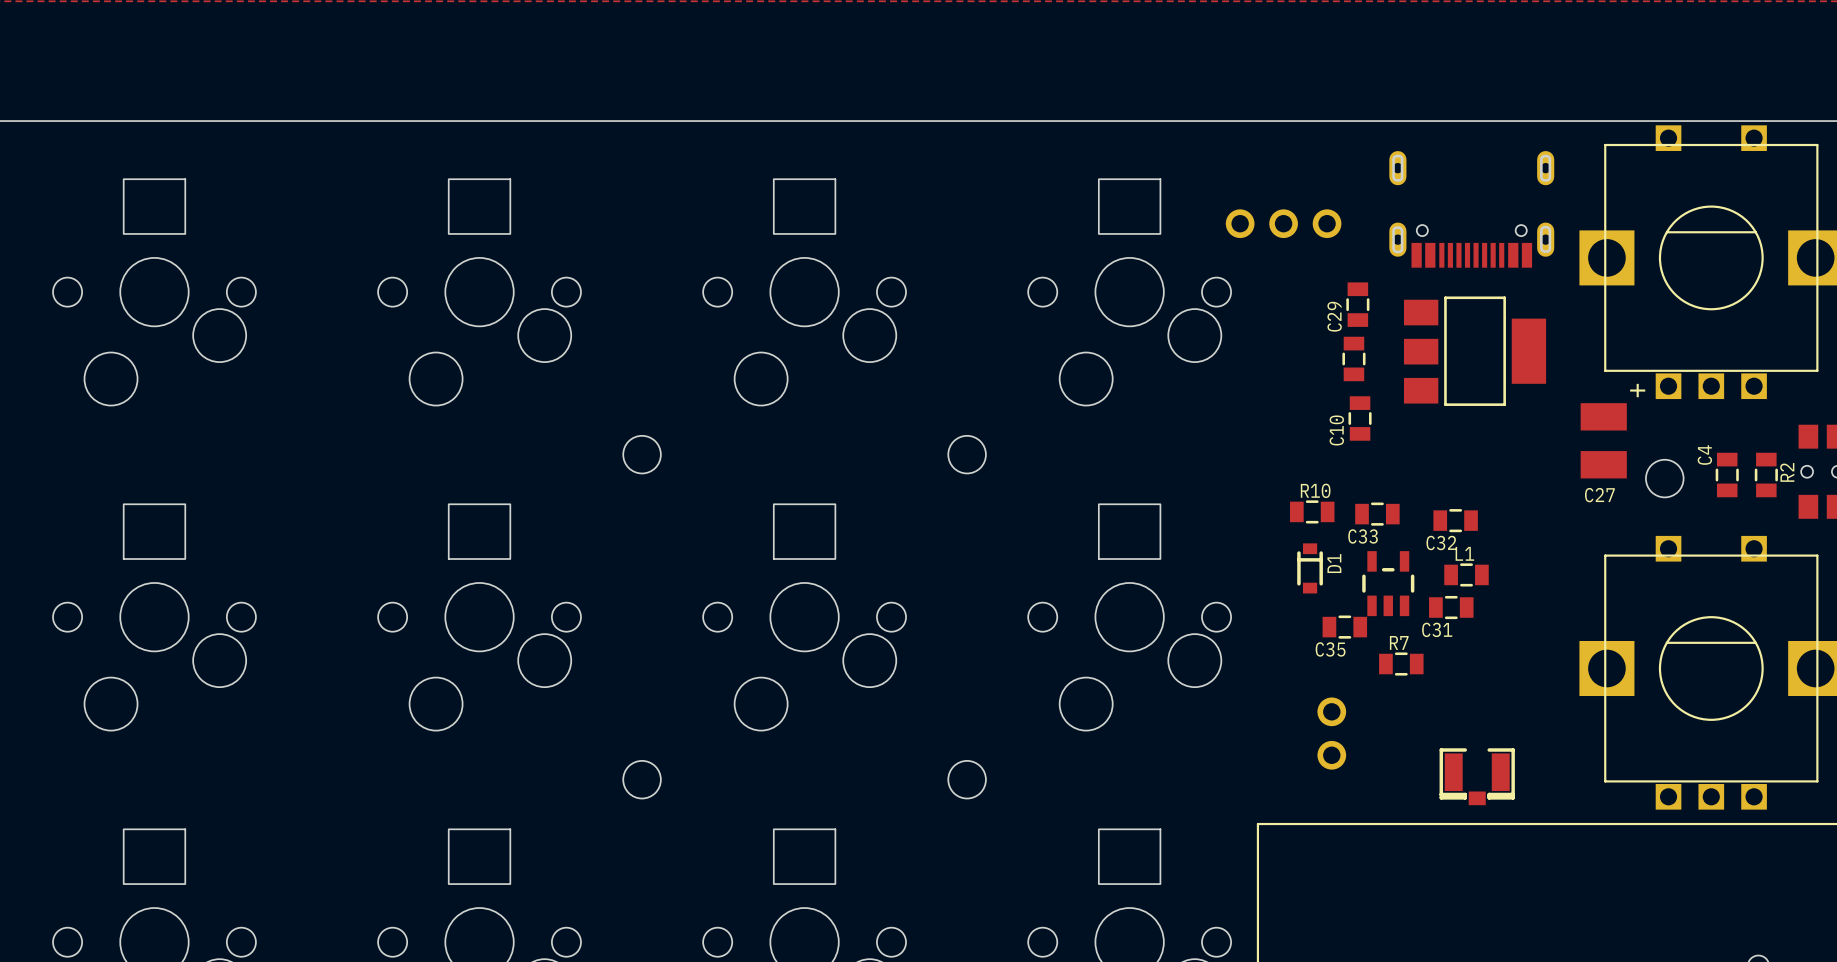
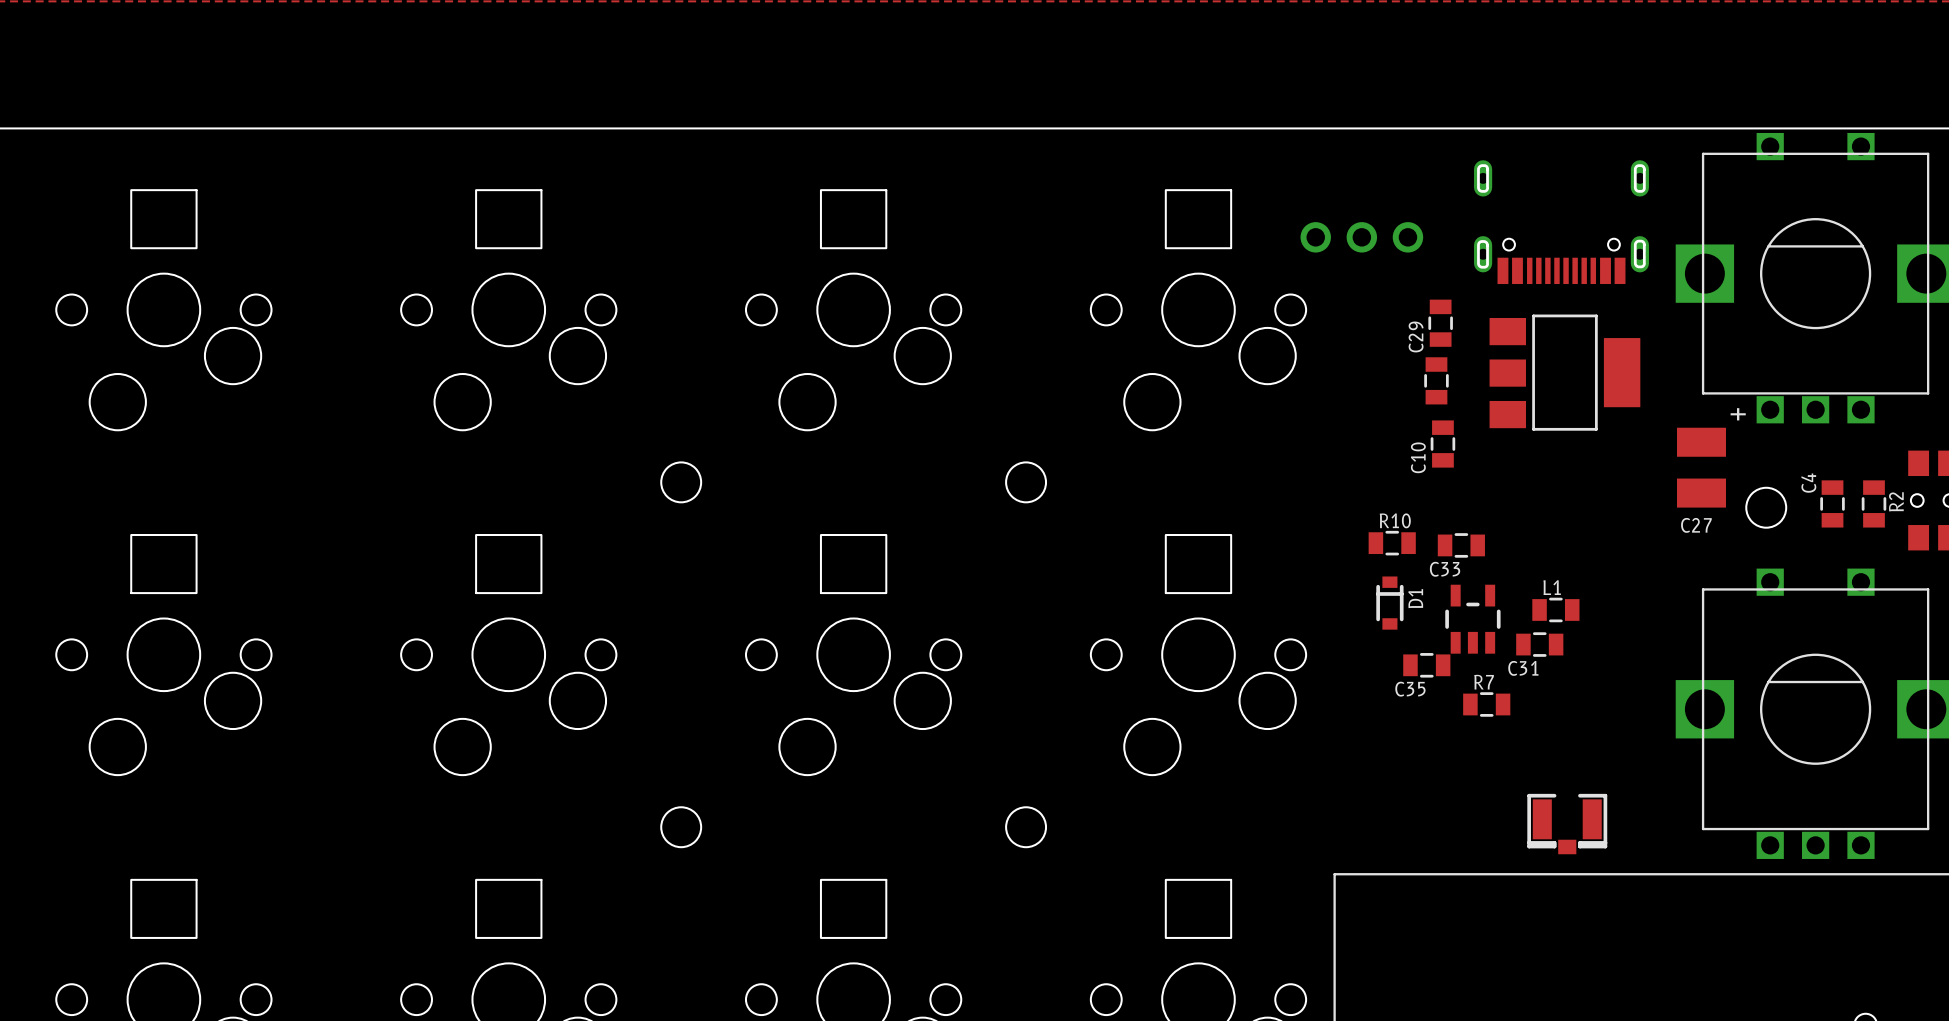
C32: (1455, 520) -> none
part: (1331, 733) -> none

